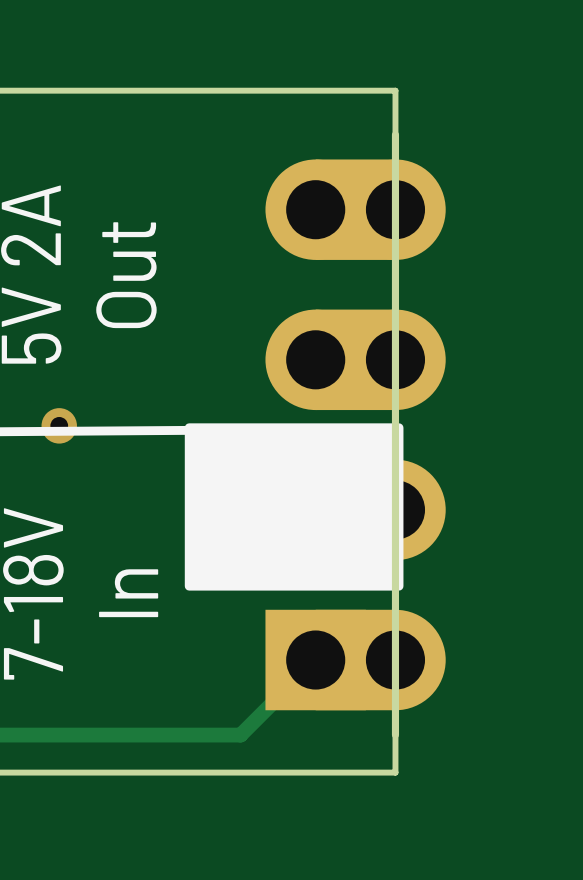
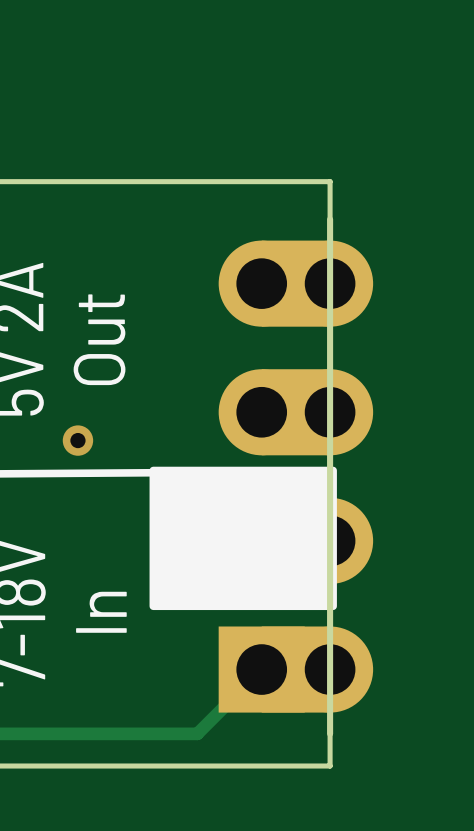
via position: (59, 425) -> (77, 440)

